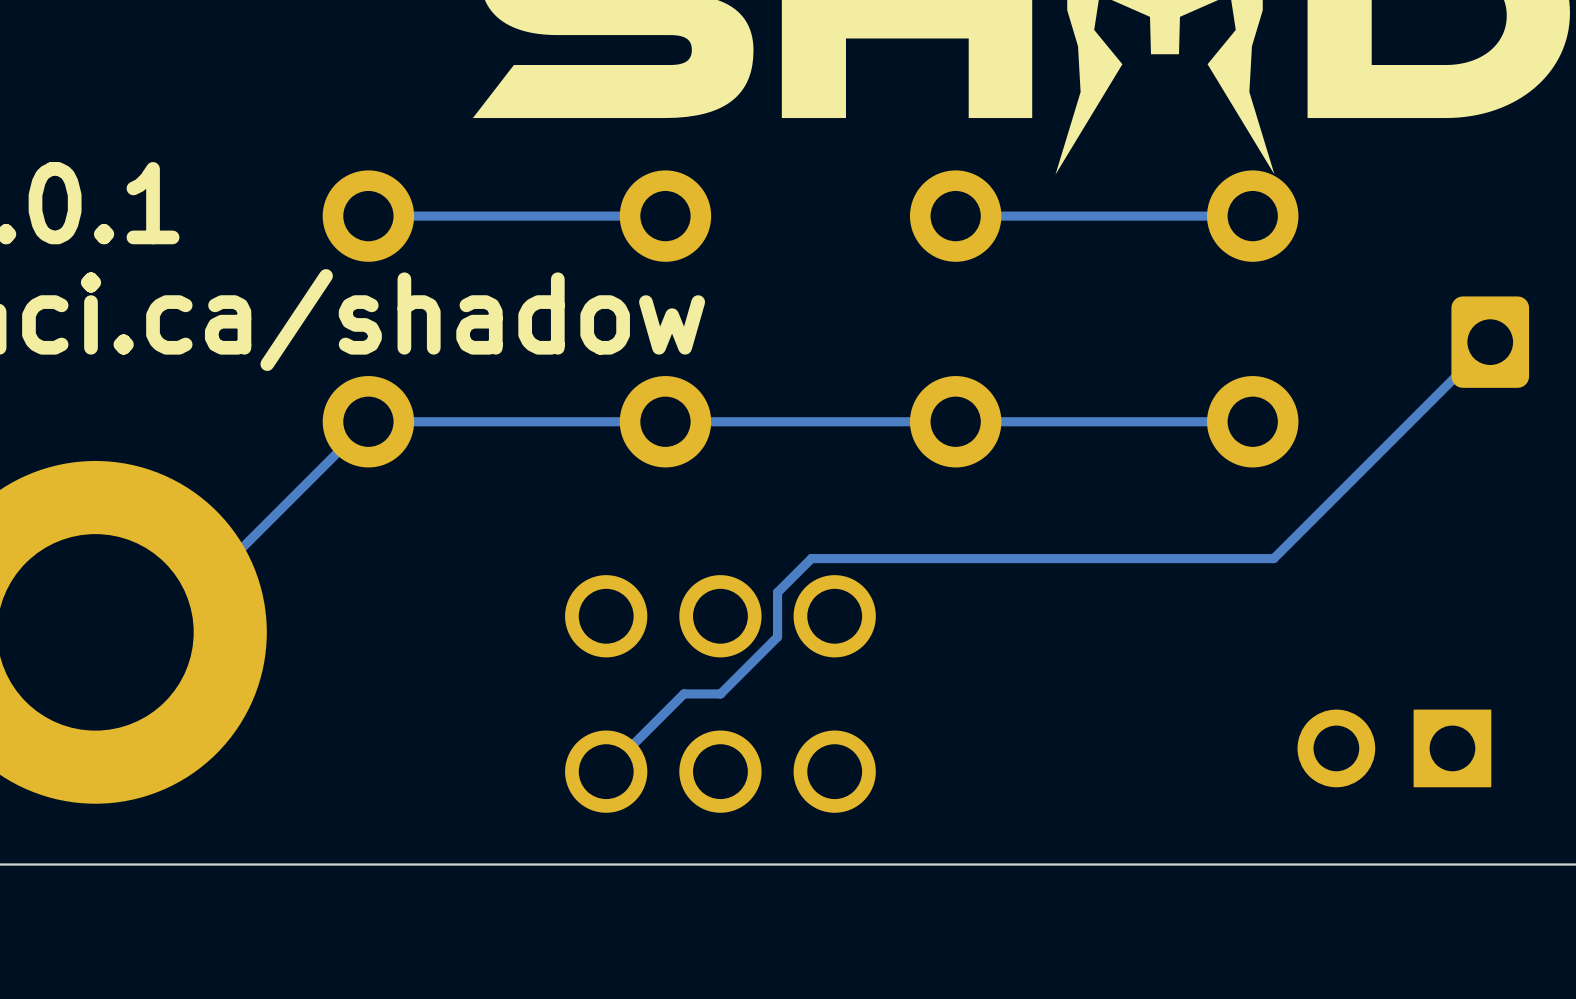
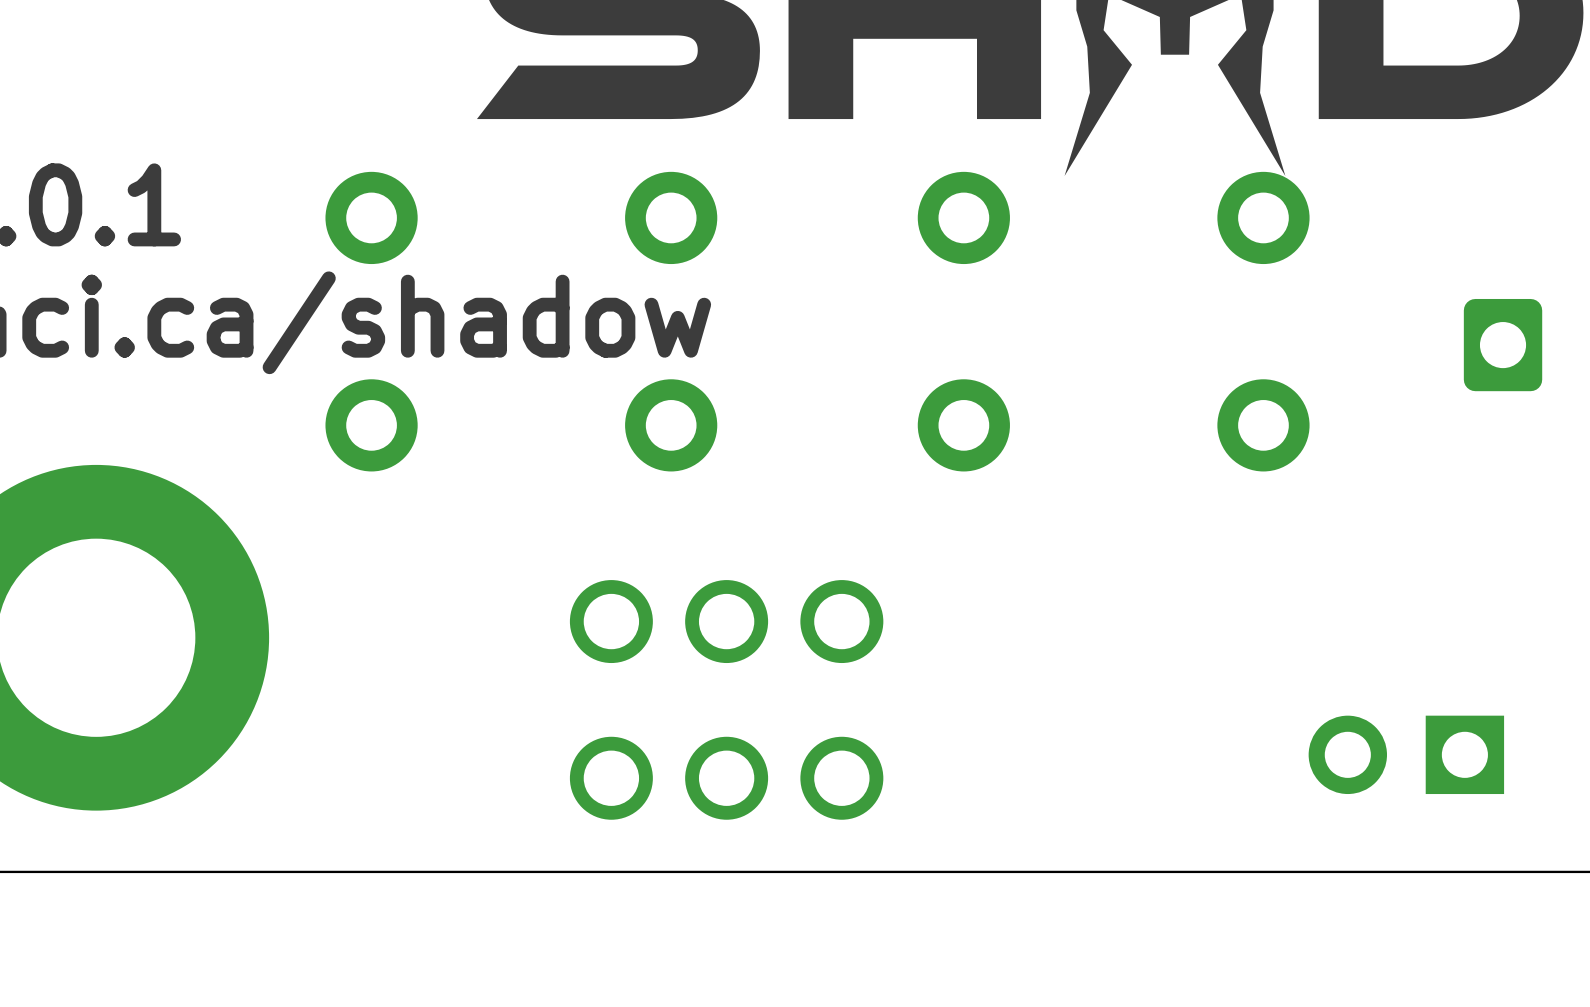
track: (665, 216) (368, 216) -> none
track: (1252, 216) (955, 216) -> none
track: (1490, 342) (1273, 558) (811, 558) (777, 592) (777, 636) (720, 693) (683, 693) (606, 771) -> none
track: (1252, 421) (368, 421) (157, 632) (95, 632) -> none

